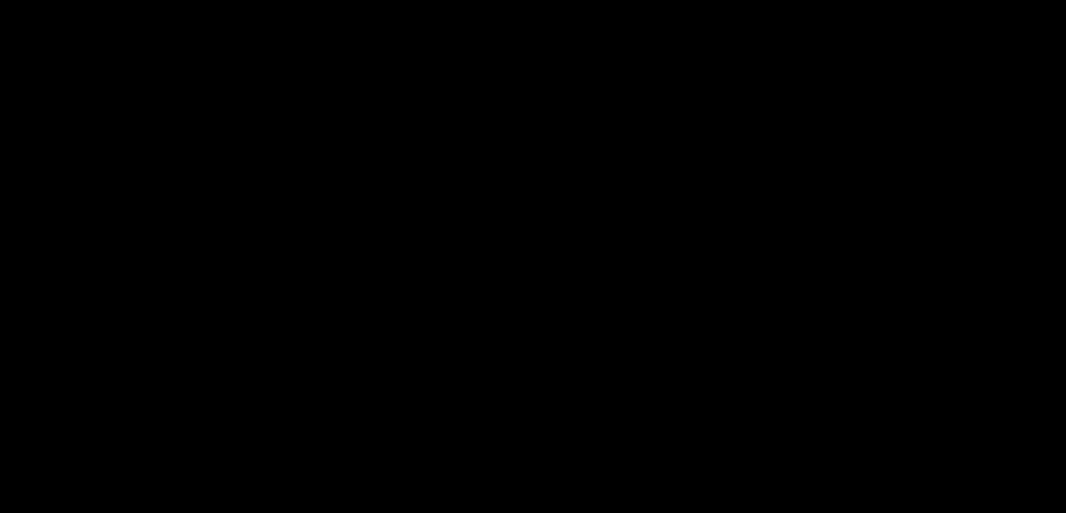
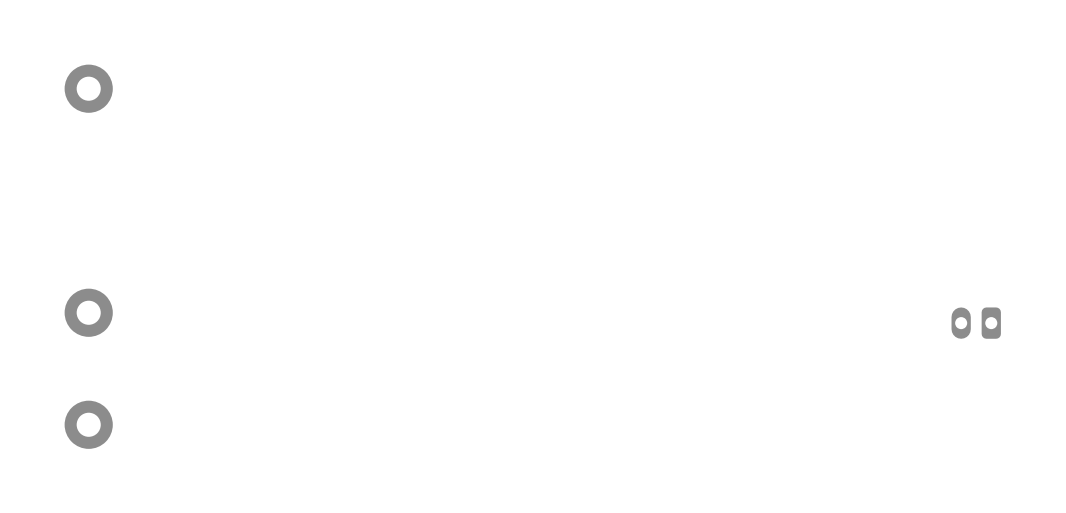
part: none -> (88, 88)
part: none -> (88, 312)
part: none -> (976, 323)
part: none -> (88, 424)

